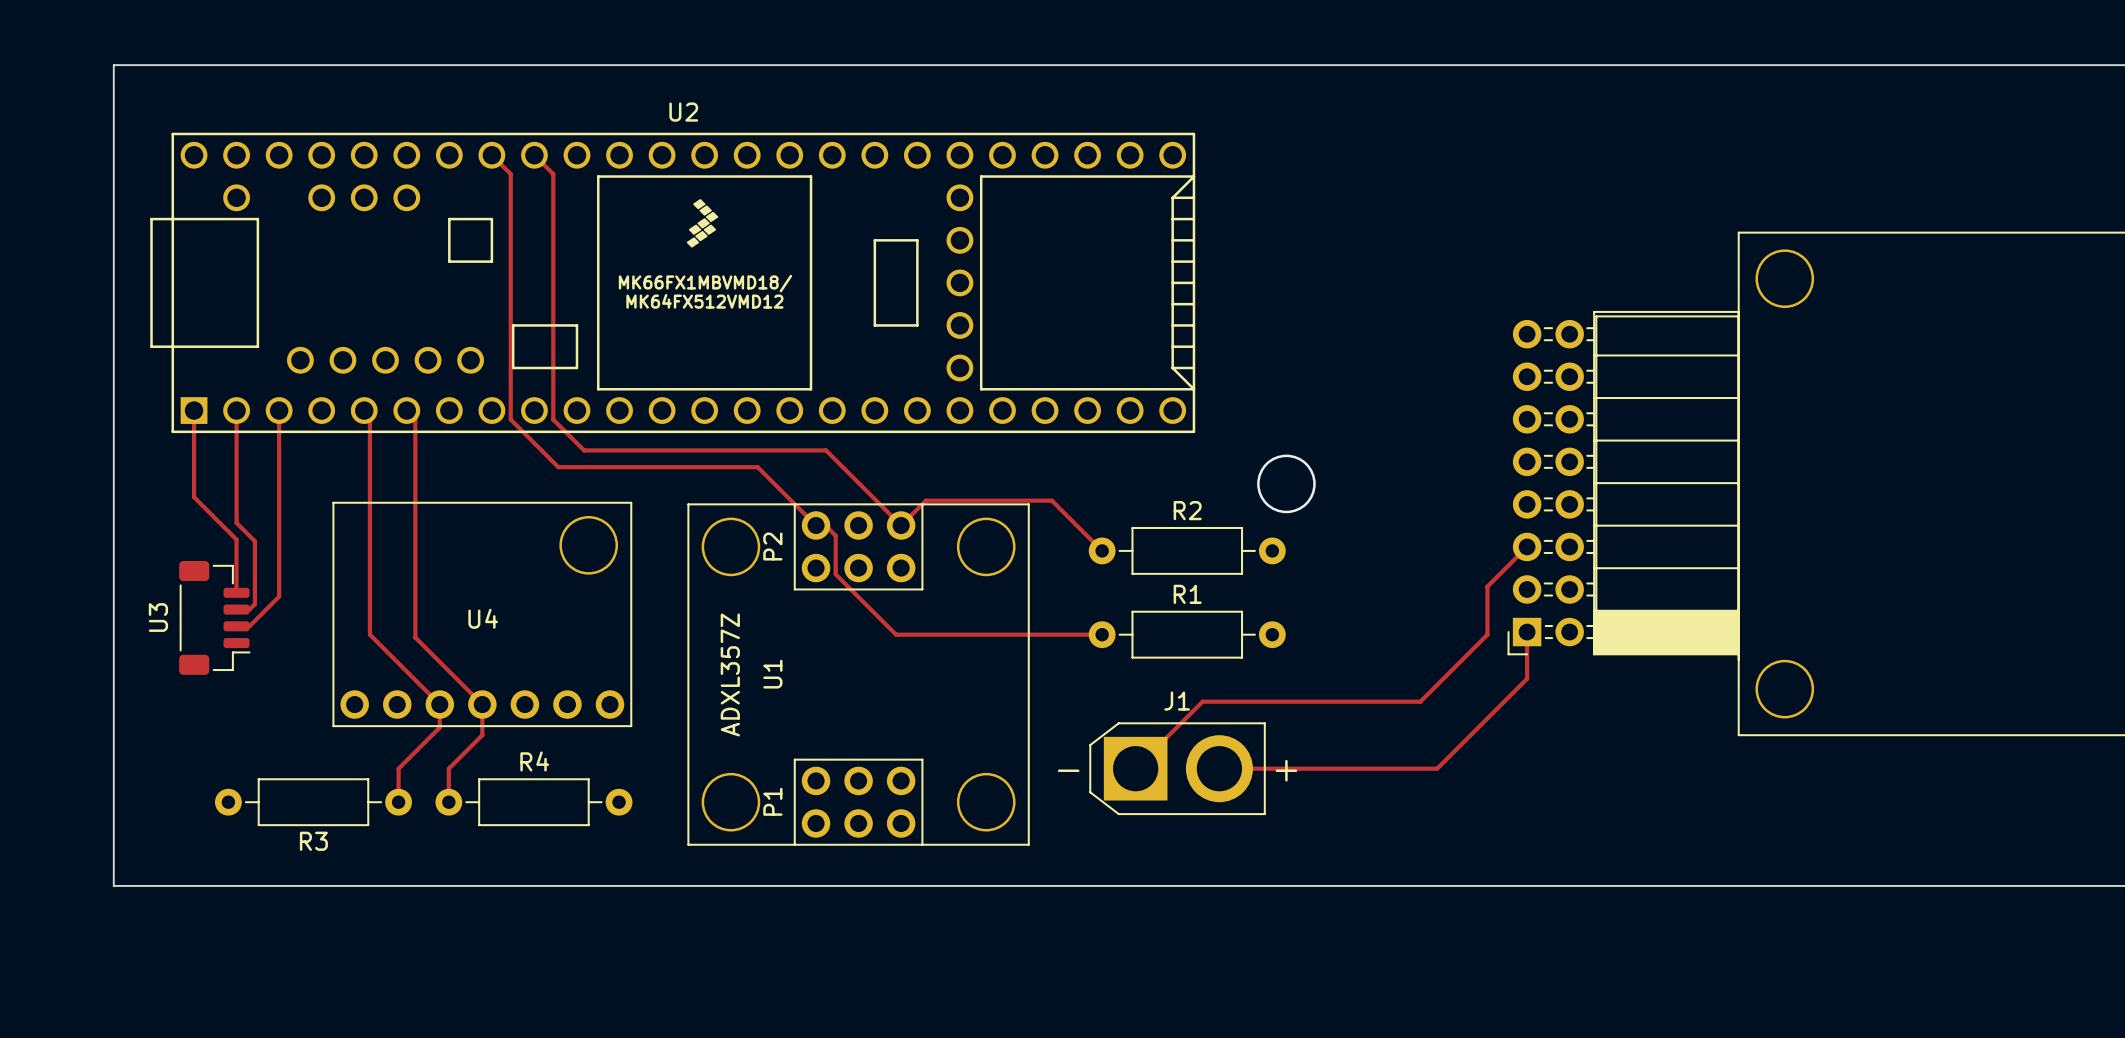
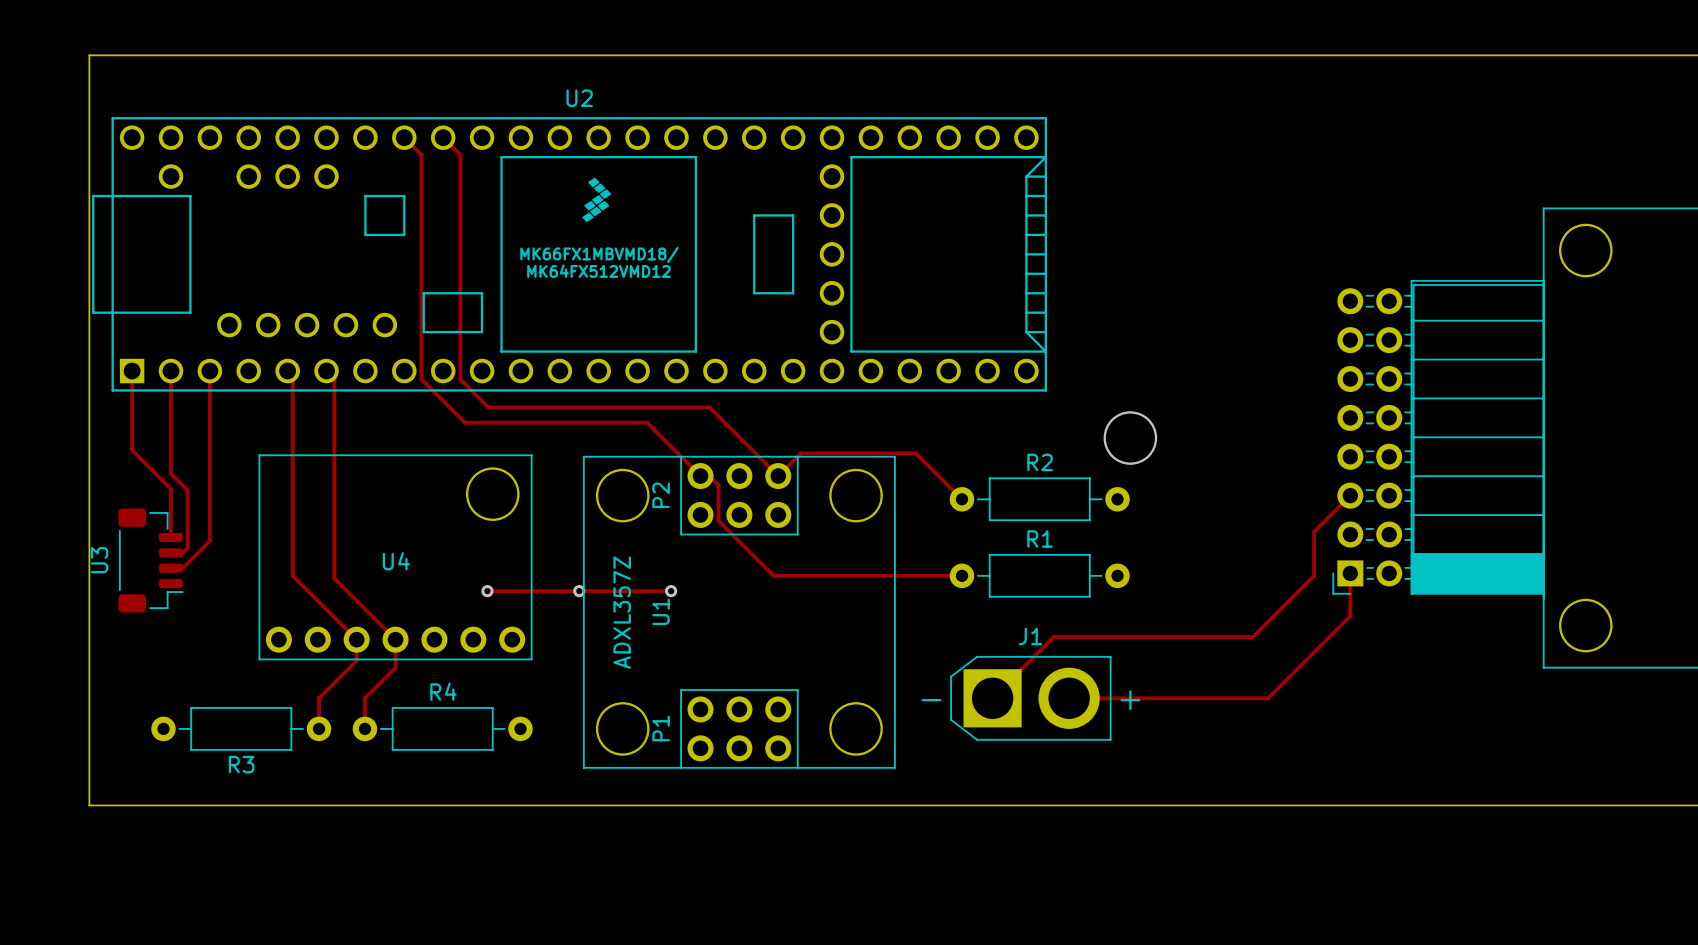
board edge: (147, 65) (113, 65) (113, 885) (147, 885) -> (89, 55) (89, 805)
track: none -> (487, 591) (671, 591)
via: none -> (487, 591)
via: none -> (579, 591)
via: none -> (671, 591)

